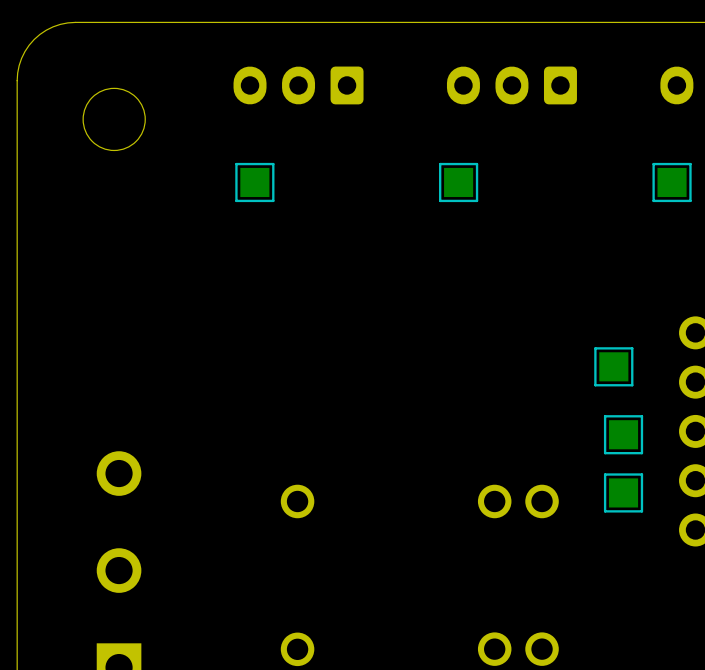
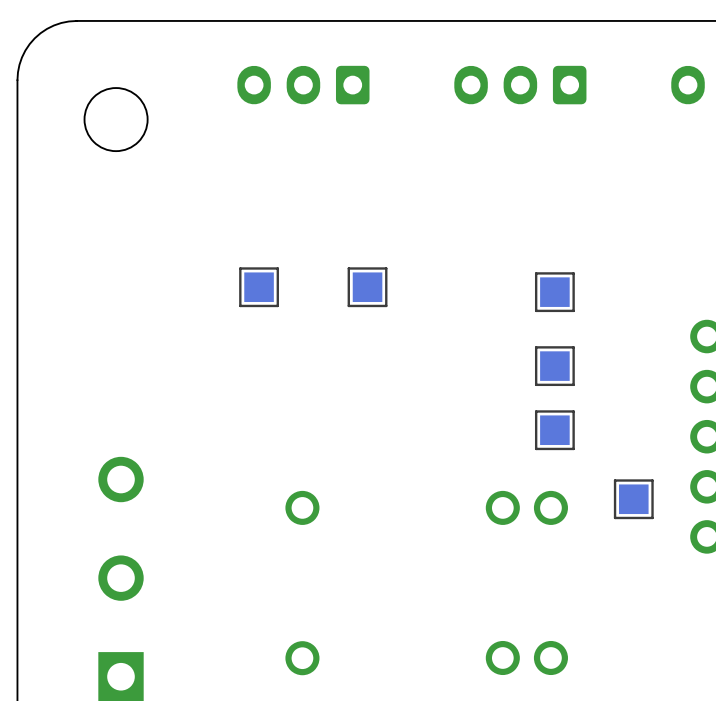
part: (254, 182) -> none
part: (458, 182) -> none
part: (672, 182) -> none
part: none -> (259, 287)
part: none -> (367, 287)
part: none -> (554, 292)
part: none -> (554, 366)
part: (613, 366) -> none
part: none -> (554, 430)
part: (623, 434) -> none

